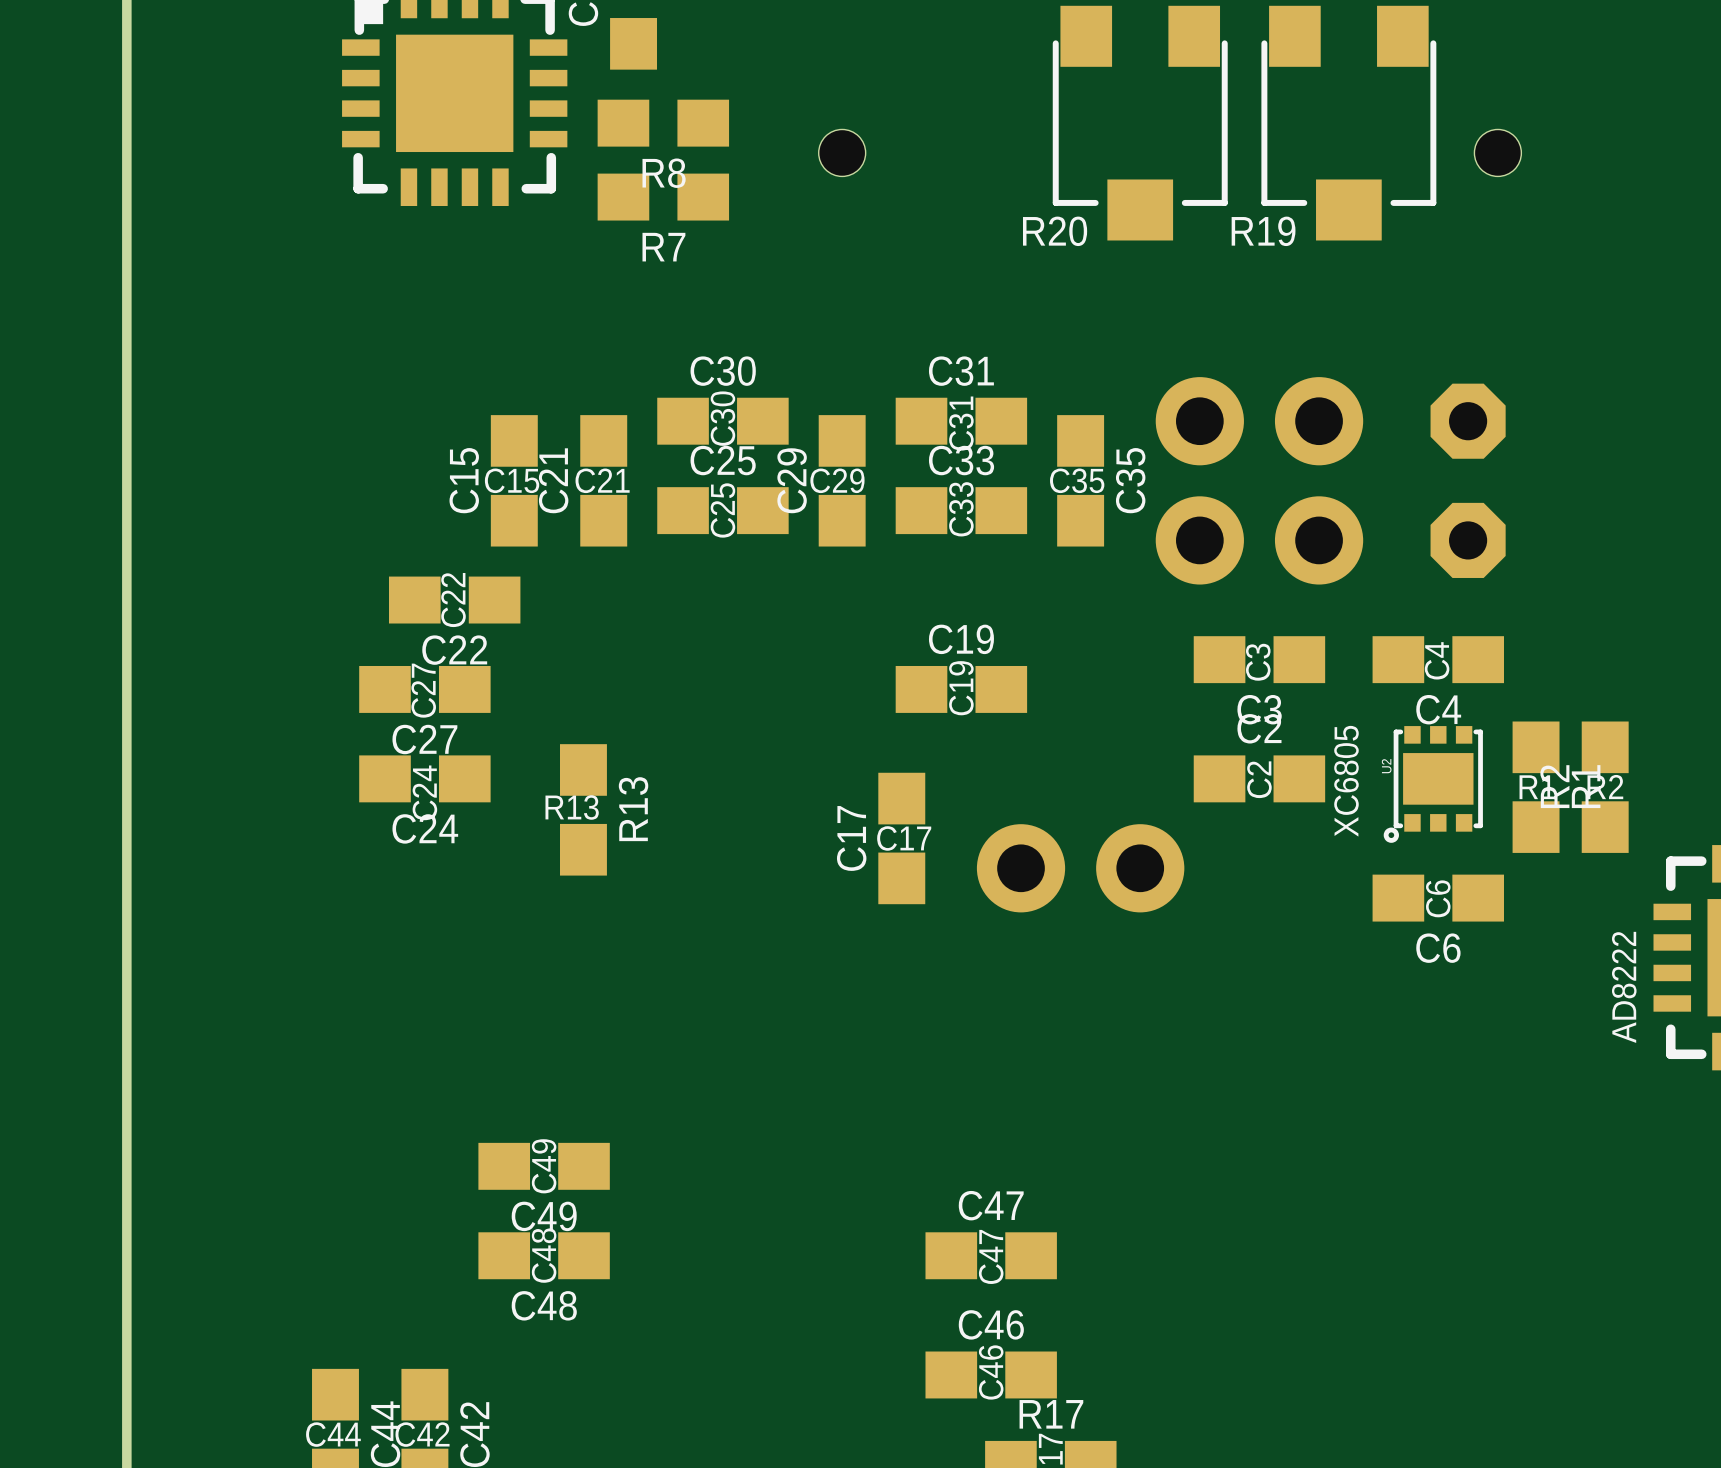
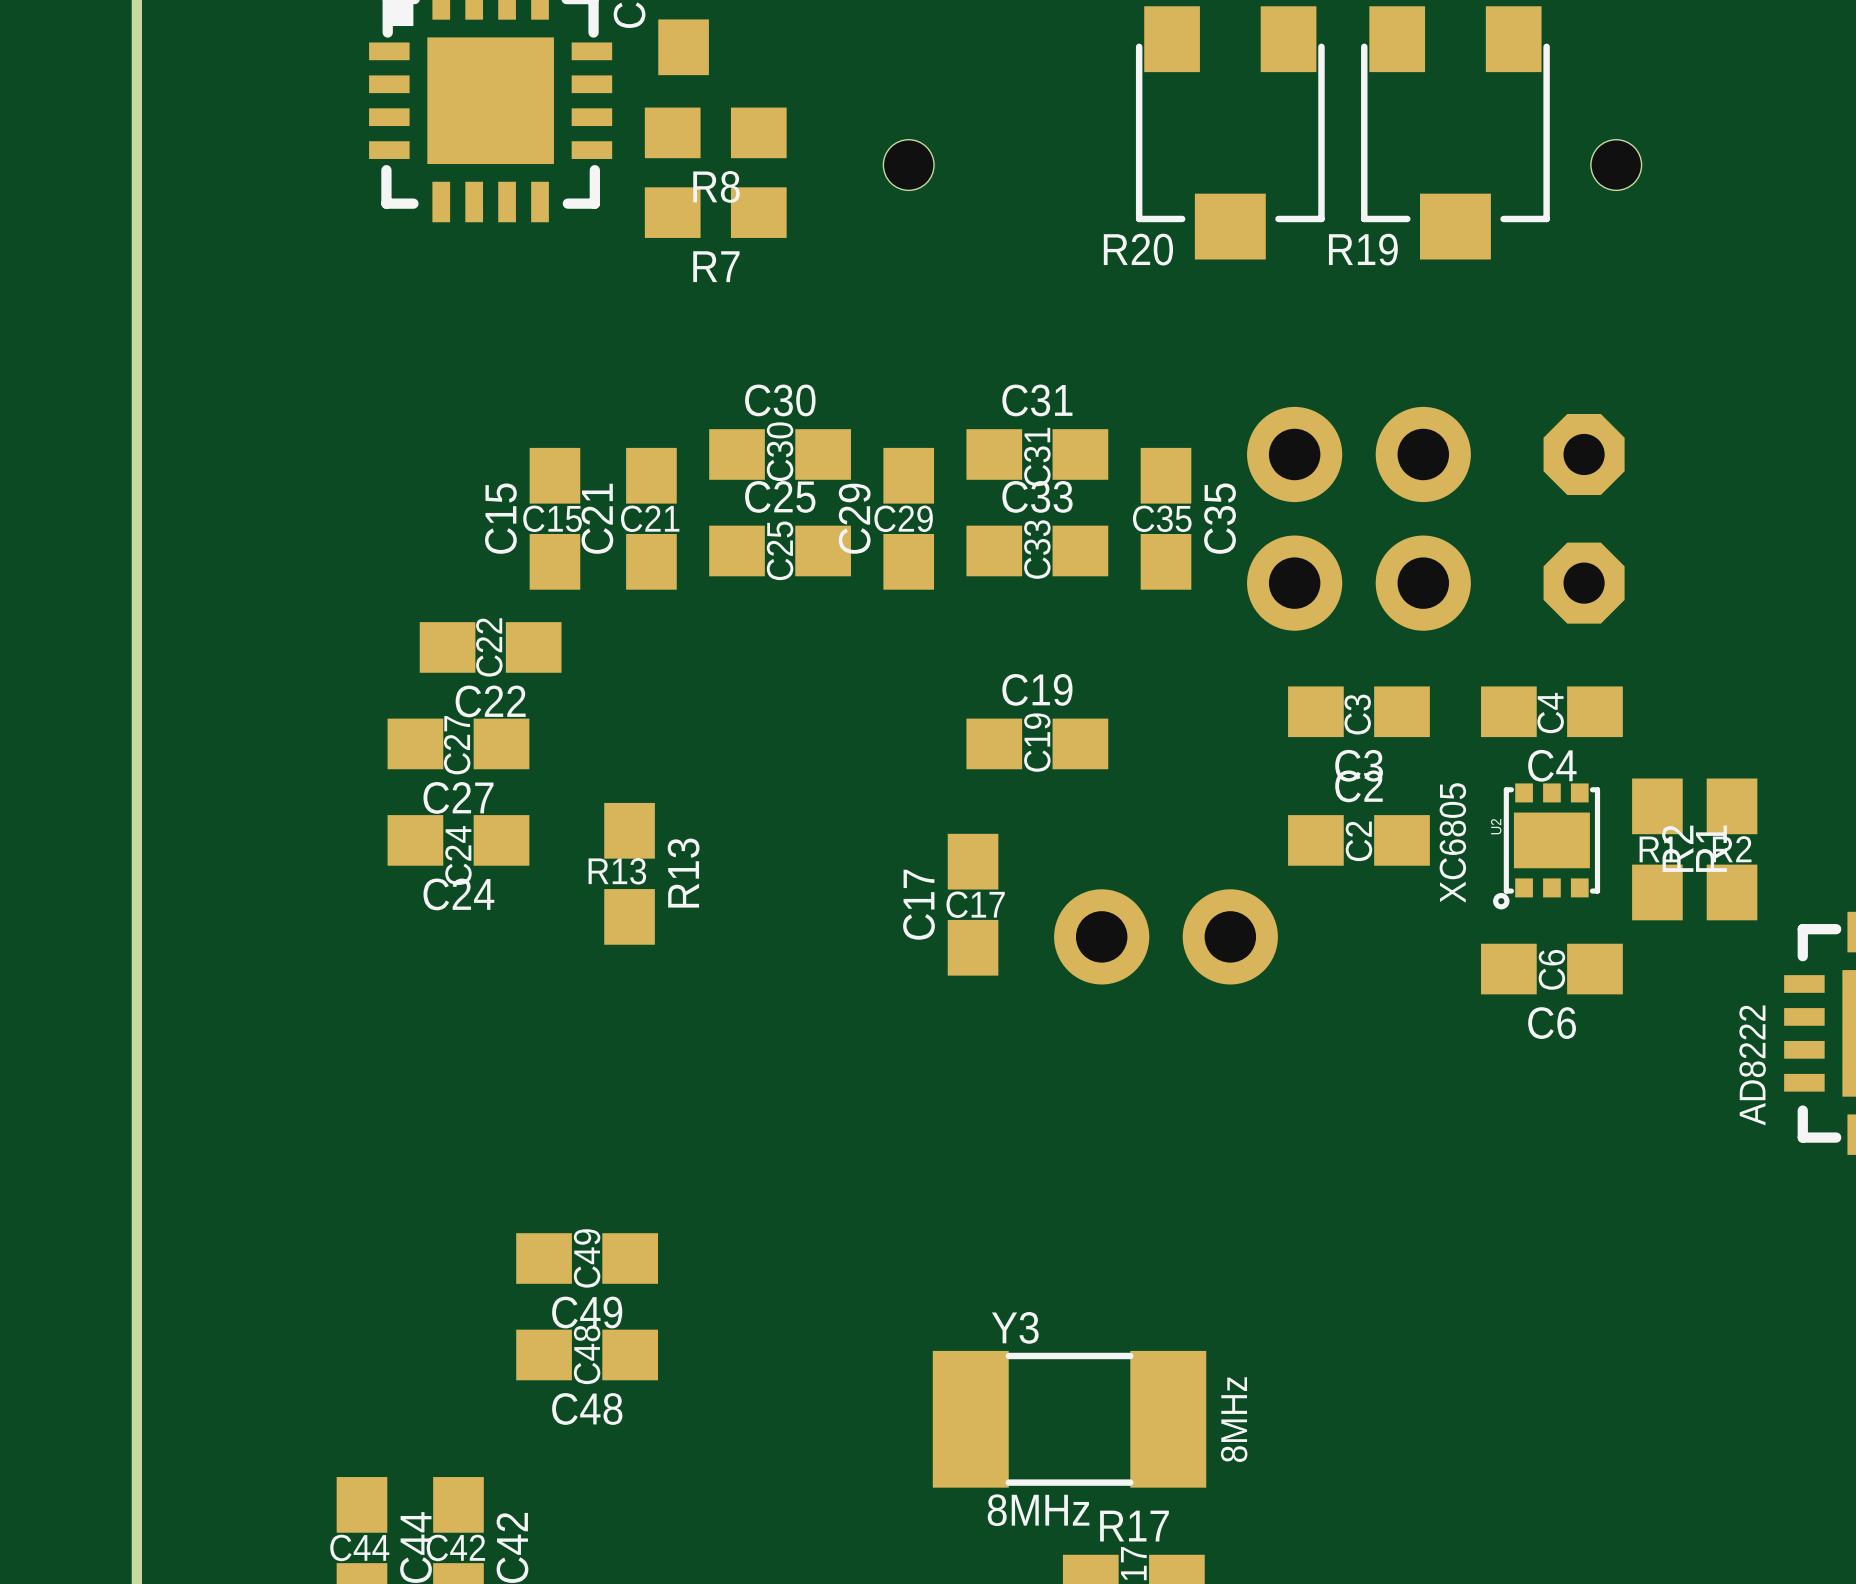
C47: (991, 1255) -> none
text: C47 (991, 1256) -> none
Y3: none -> 8MHz (1069, 1419)
text: none -> 8MHz (1234, 1419)
text: C46 (991, 1372) -> none
C46: (991, 1374) -> none

